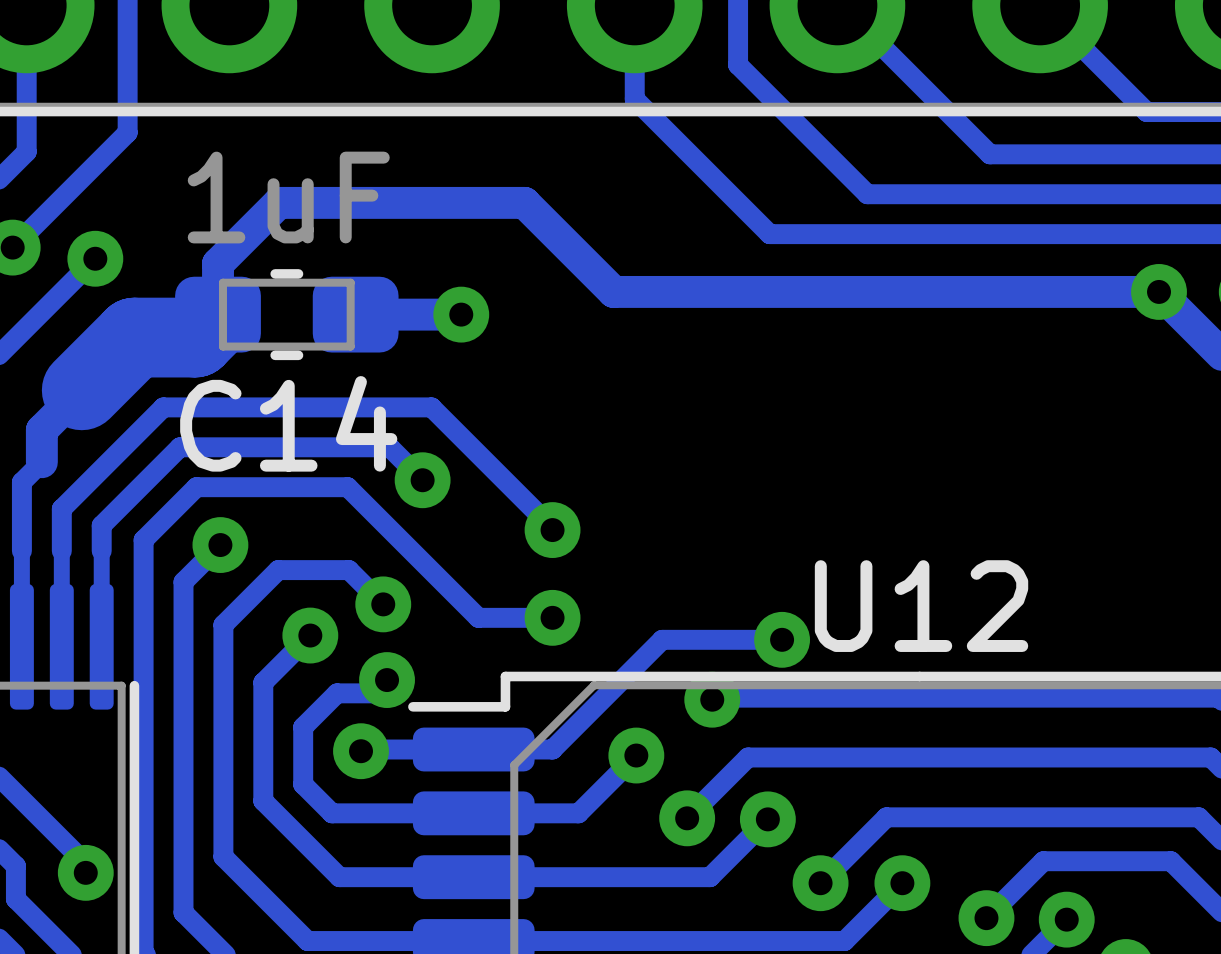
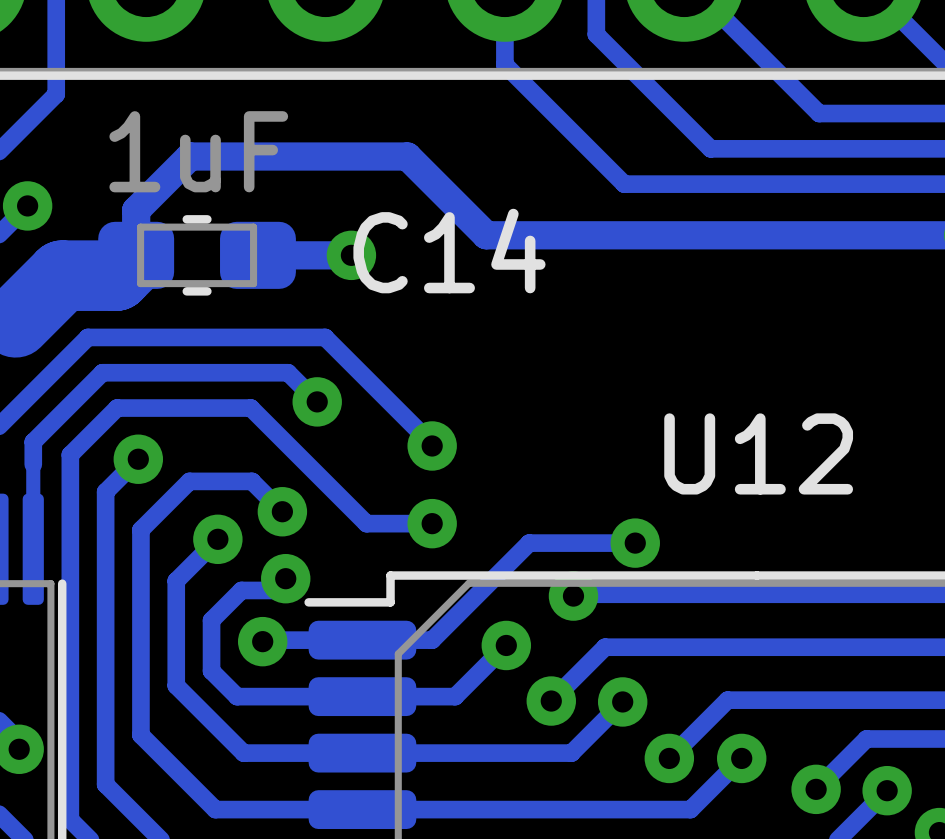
C14 name position: C14 (288, 423) -> C14 (449, 251)
U12 name position: U12 (921, 606) -> U12 (758, 453)

